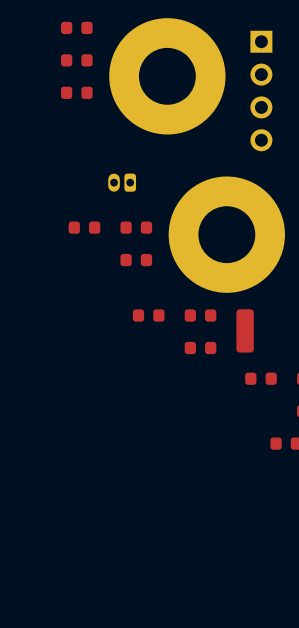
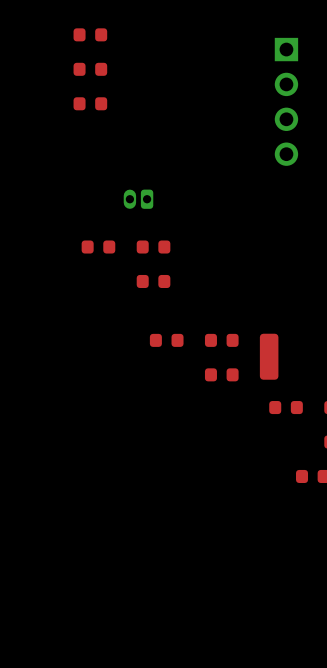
part: (167, 76) -> none
part: (226, 234) -> none

